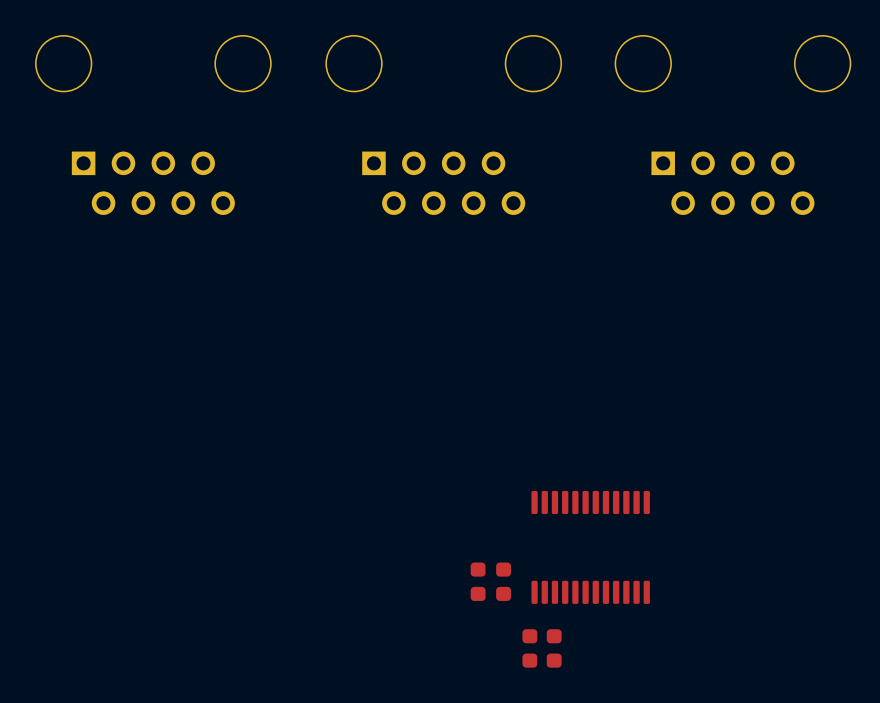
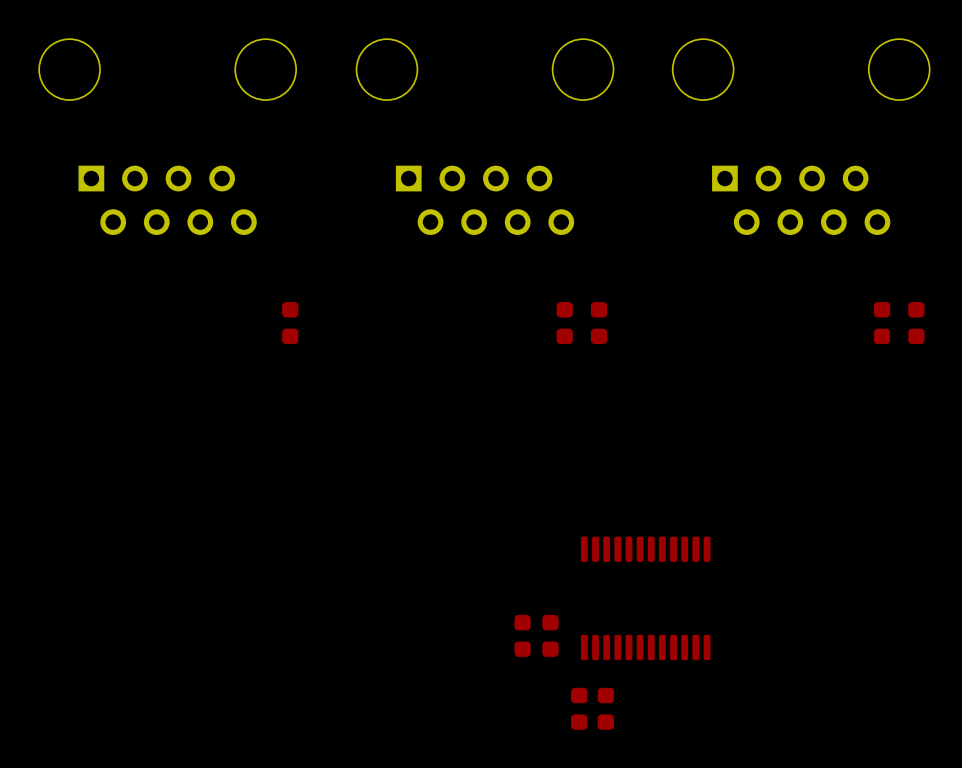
part: none -> (290, 323)
part: none -> (564, 323)
part: none -> (599, 323)
part: none -> (882, 323)
part: none -> (916, 323)

